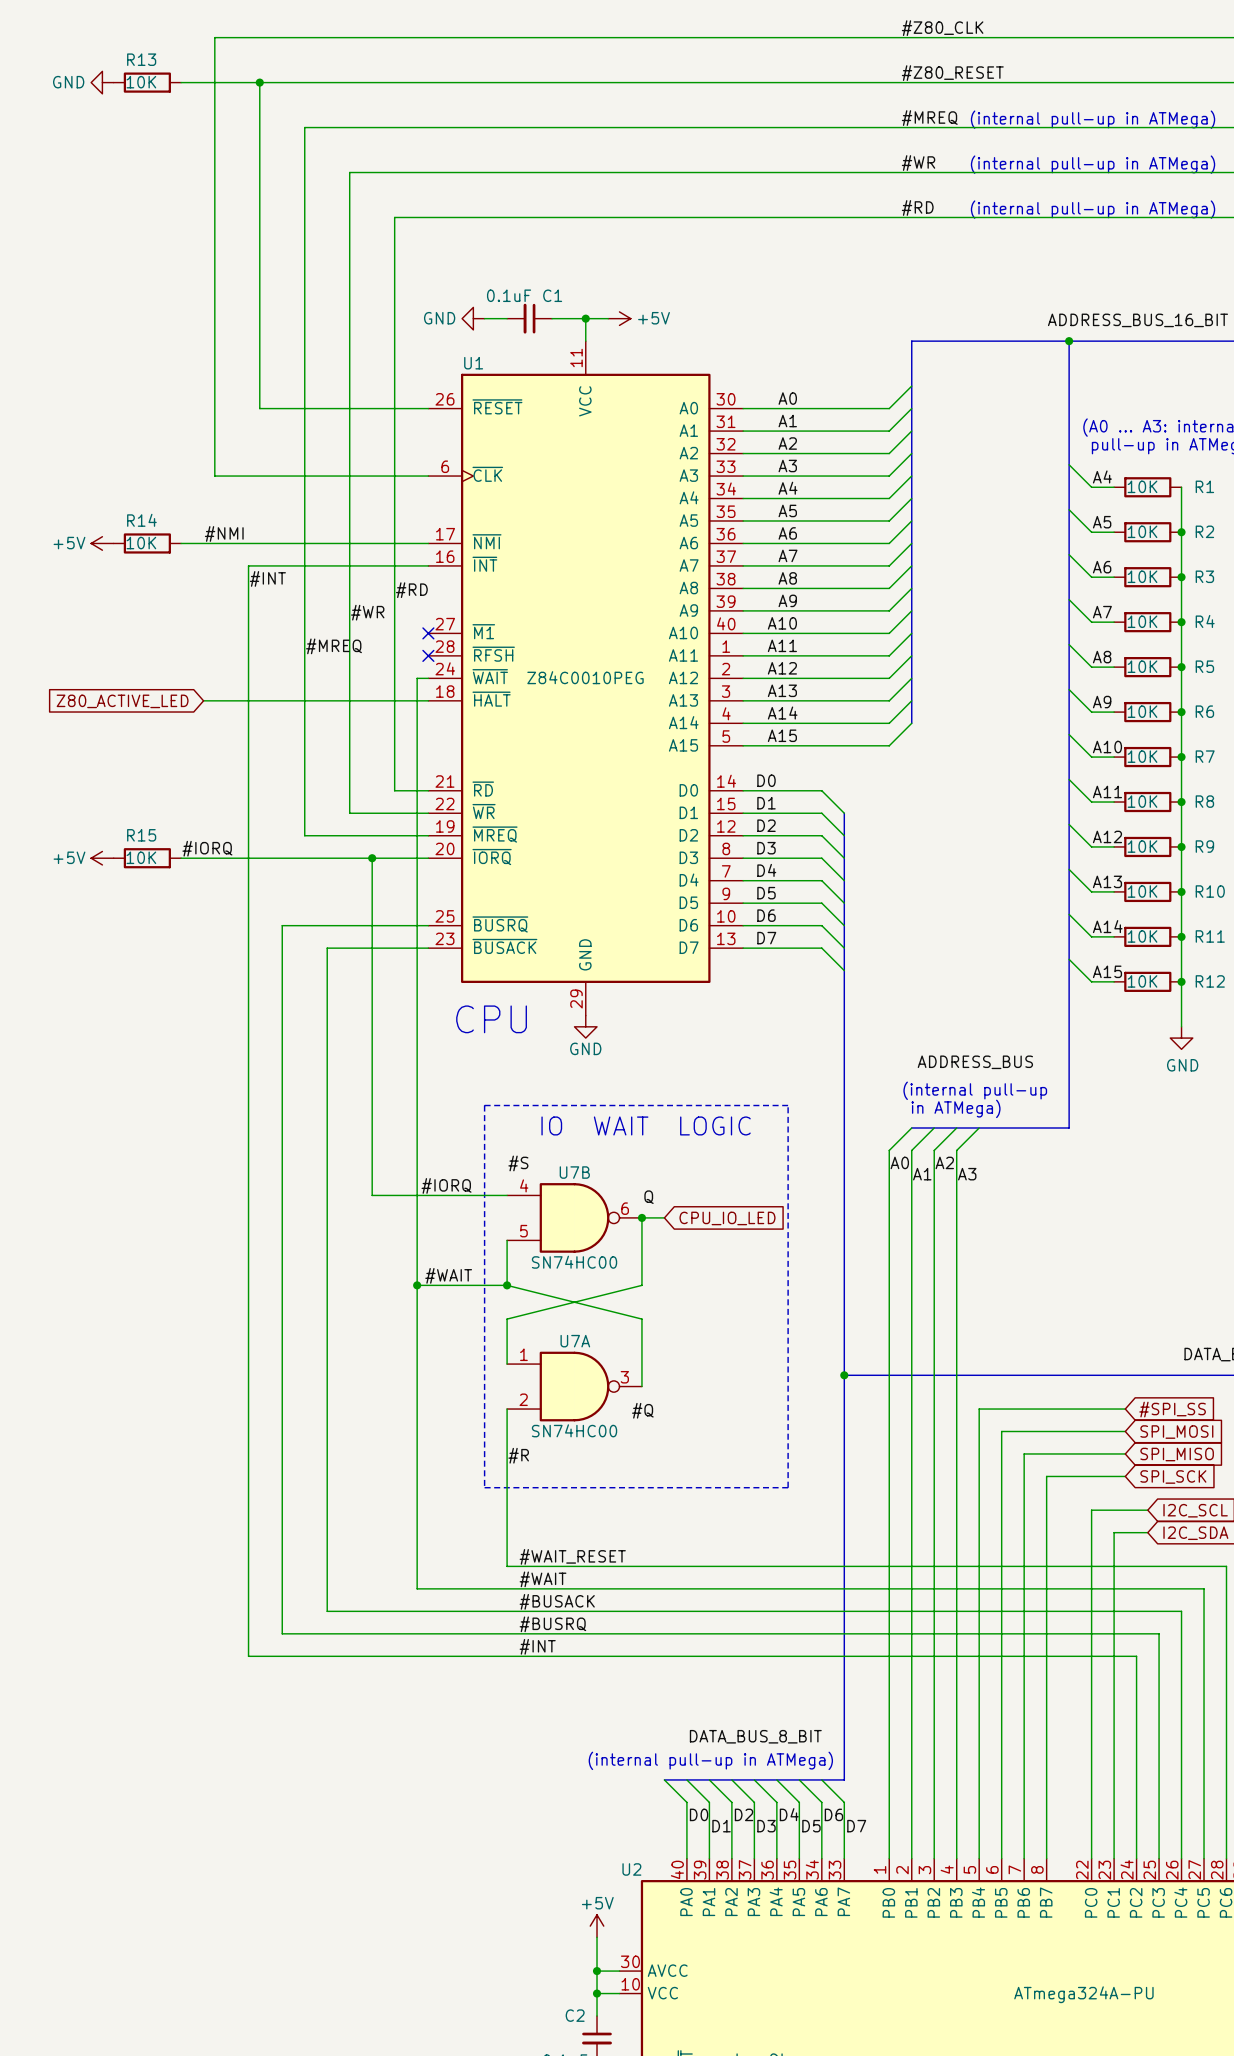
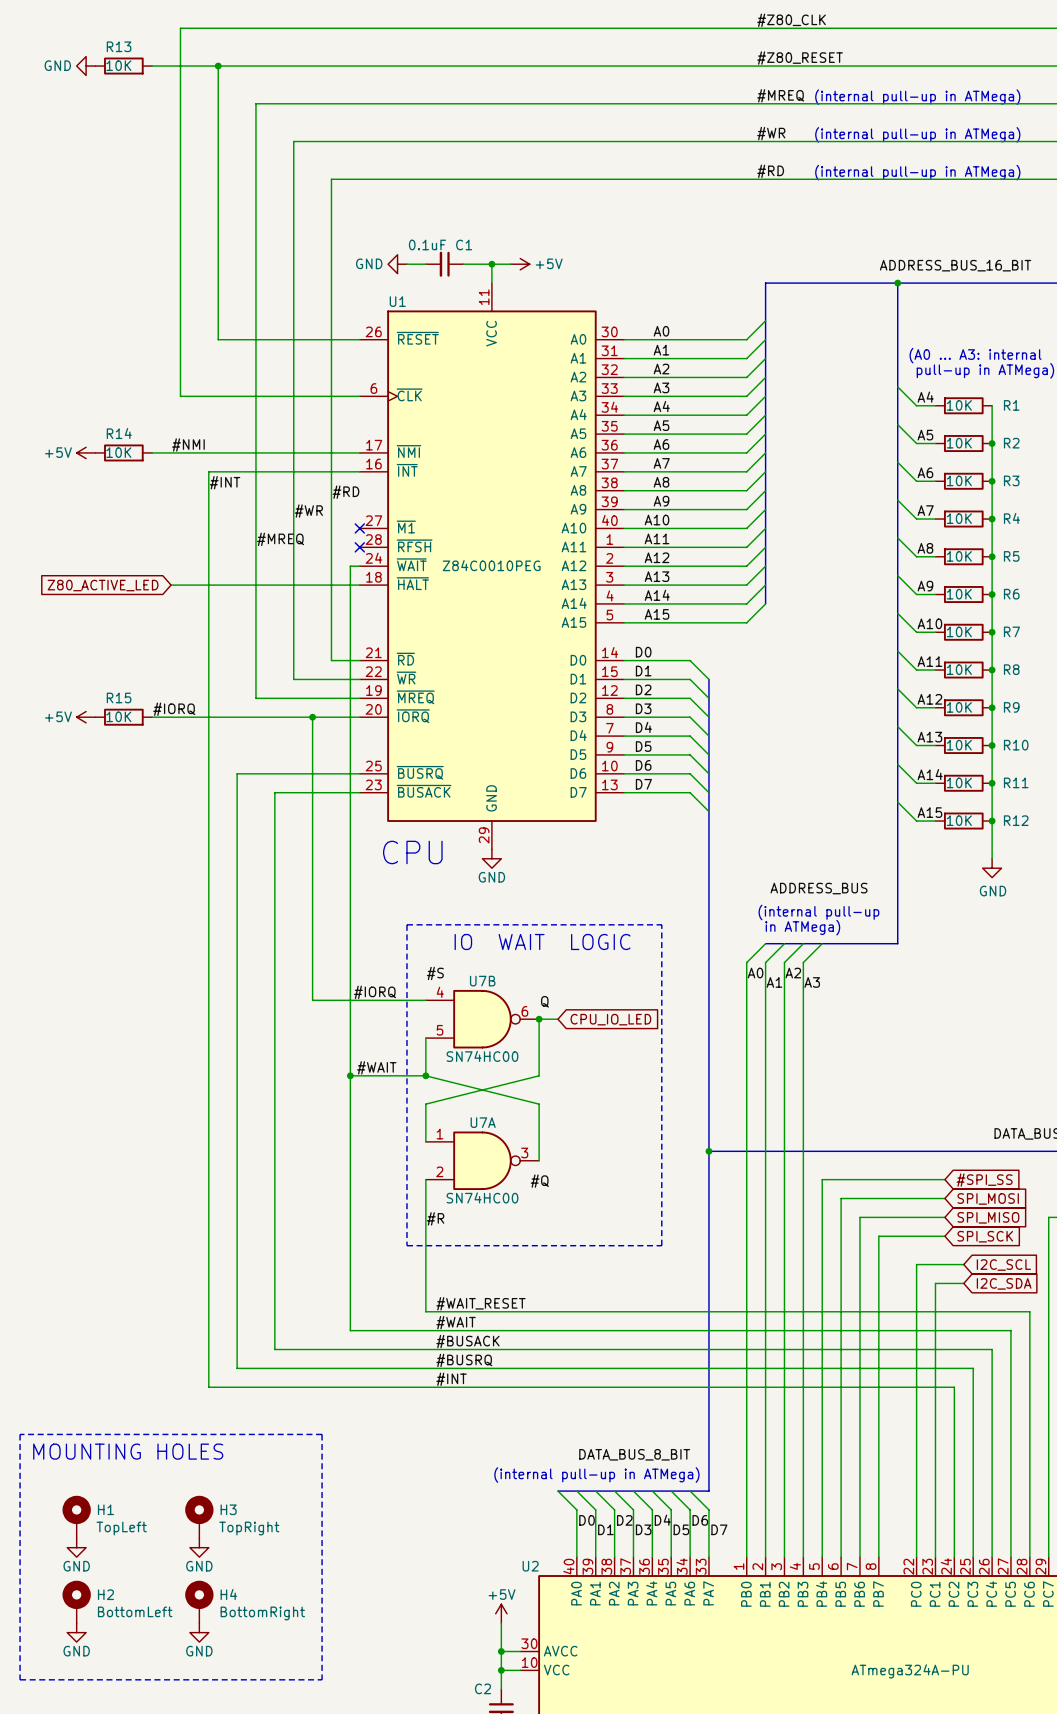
line: none -> (20, 1434) (322, 1434) (322, 1679) (20, 1679) (20, 1434)
text: none -> MOUNTING HOLES (128, 1451)
H1: none -> TopLeft (76, 1517)
H3: none -> TopRight (199, 1517)
power symbol: none -> GND (76, 1547)
power symbol: none -> GND (199, 1547)
H2: none -> BottomLeft (76, 1601)
H4: none -> BottomRight (199, 1601)
power symbol: none -> GND (76, 1632)
power symbol: none -> GND (199, 1632)

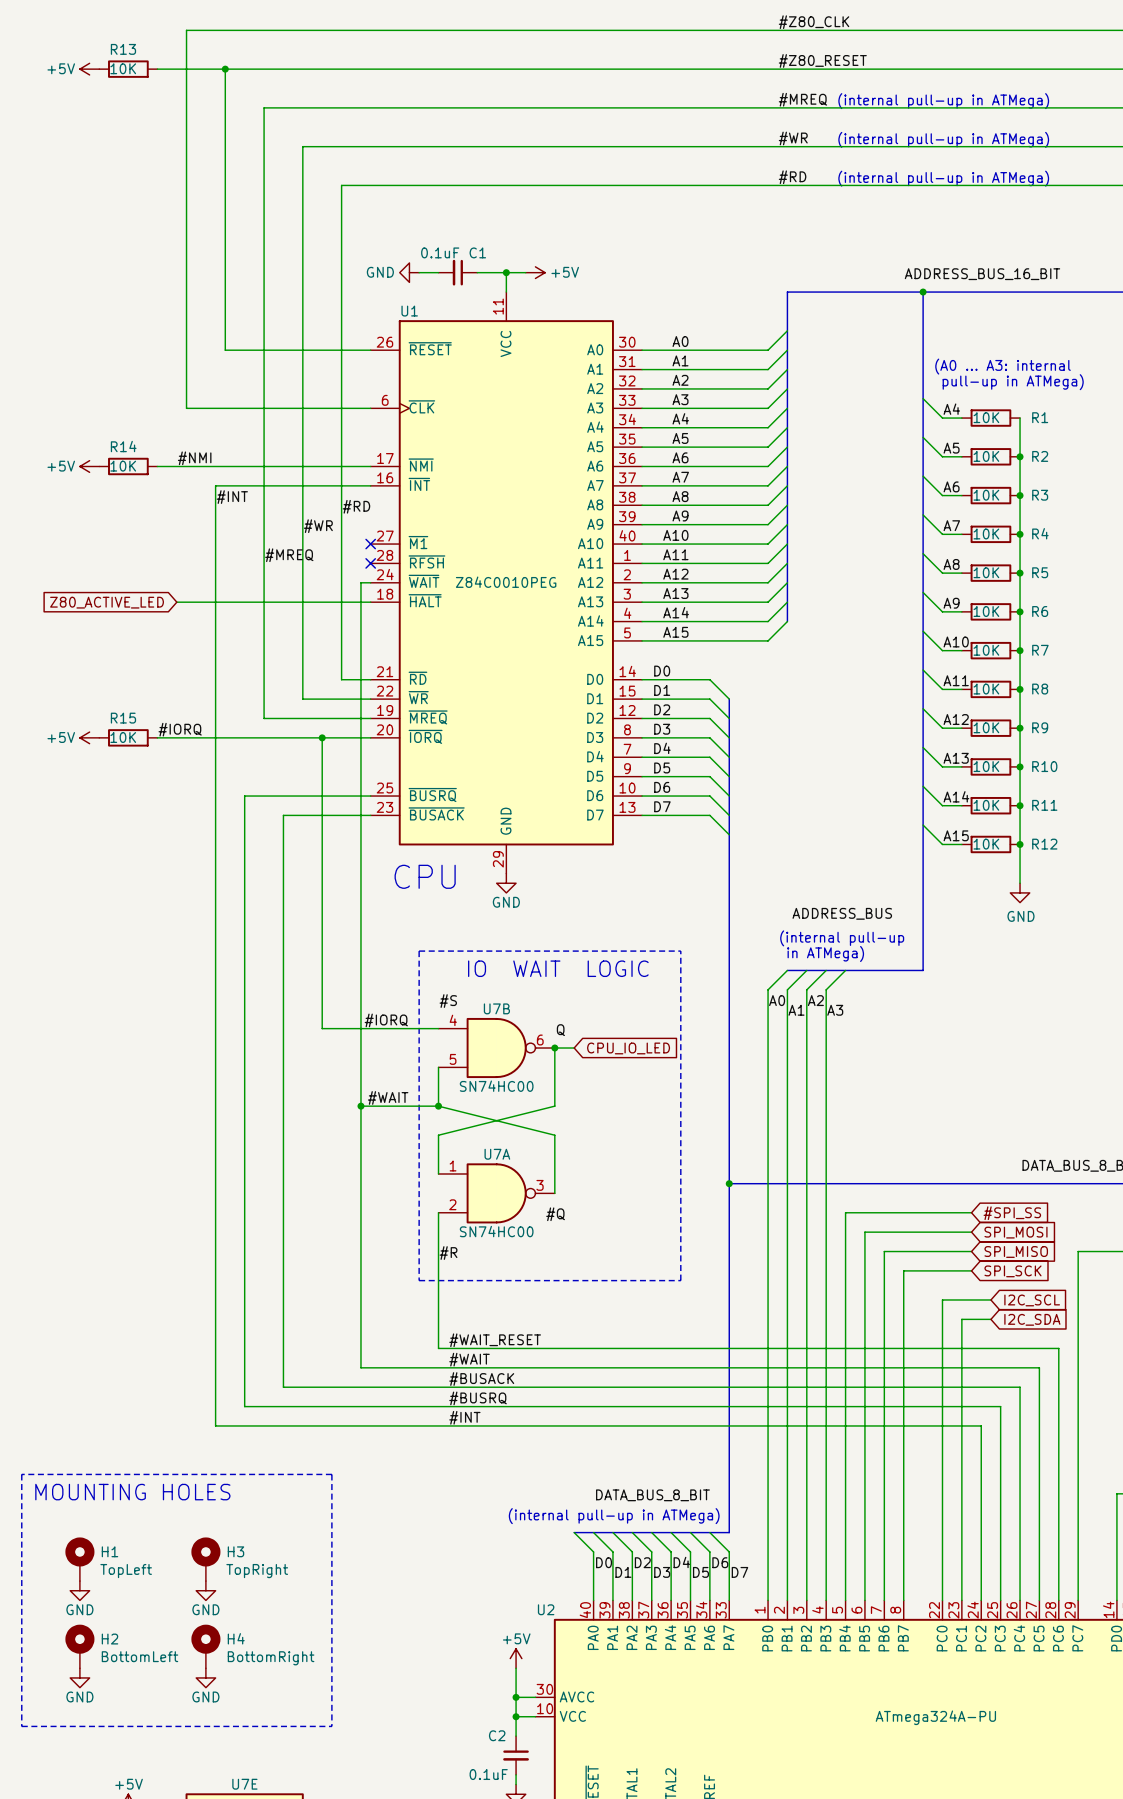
power symbol: GND (86, 66) -> +5V (89, 69)

